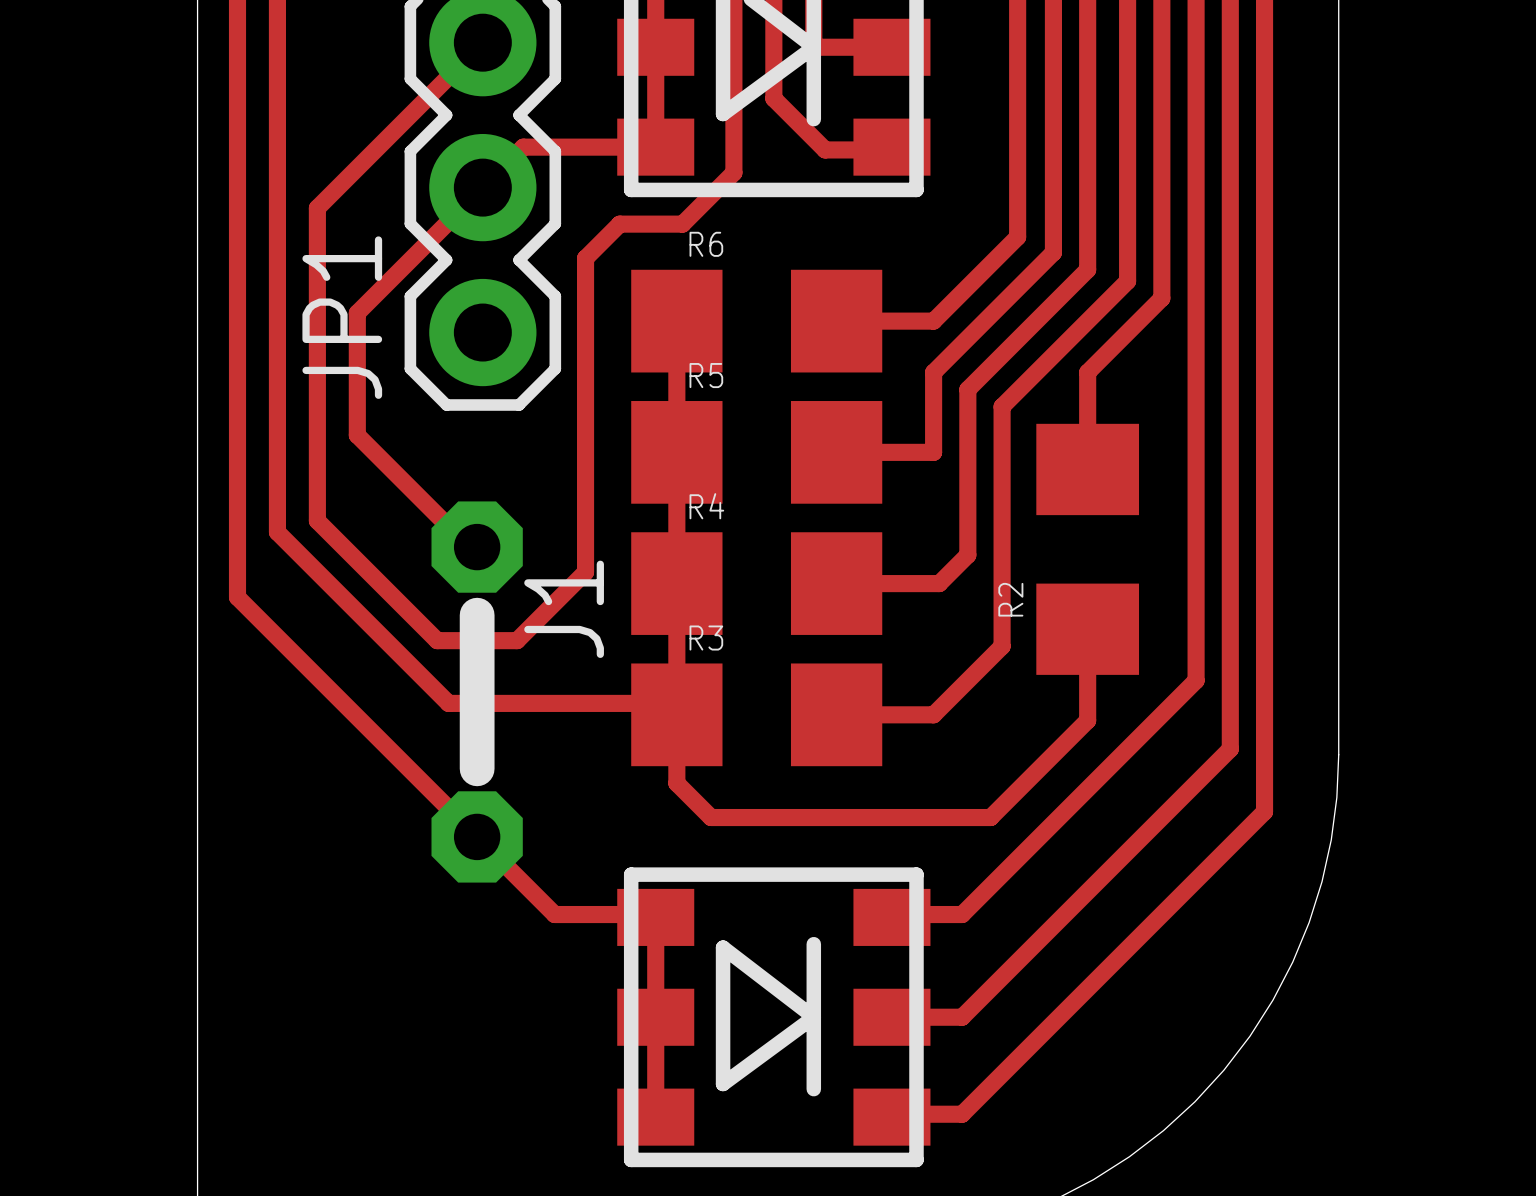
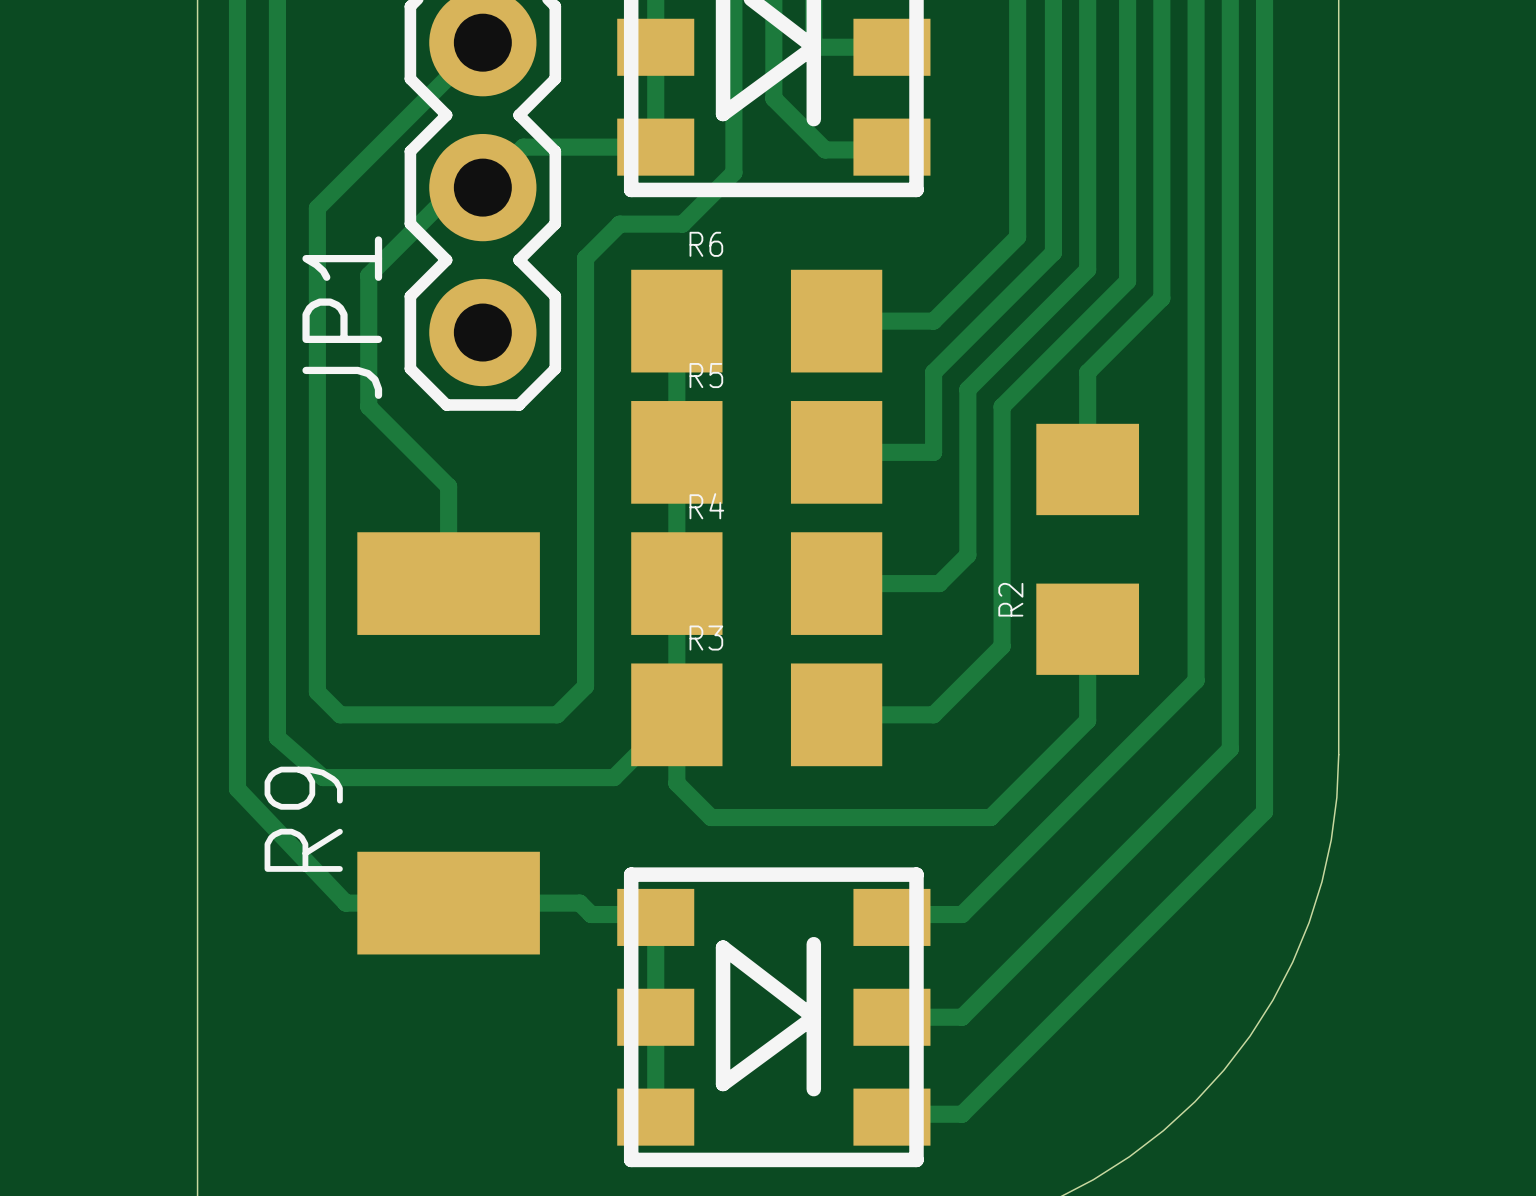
track: (482, 187) (357, 313) (357, 435) (469, 547) (477, 547) -> (482, 187) (456, 187) (368, 275) (368, 406) (448, 486) (448, 583)
track: (317, 520) (437, 640) (517, 640) (585, 572) -> (317, 520) (317, 692) (340, 714) (557, 714) (585, 686) (585, 572)
track: (277, 532) (448, 703) (665, 703) (676, 714) -> (277, 532) (277, 737) (323, 777) (614, 777) (676, 714)
track: (237, 597) (554, 914) (591, 914) -> (237, 597) (237, 789) (345, 903) (579, 903) (591, 914)
J1: (477, 692) -> none
R9: none -> (448, 743)

